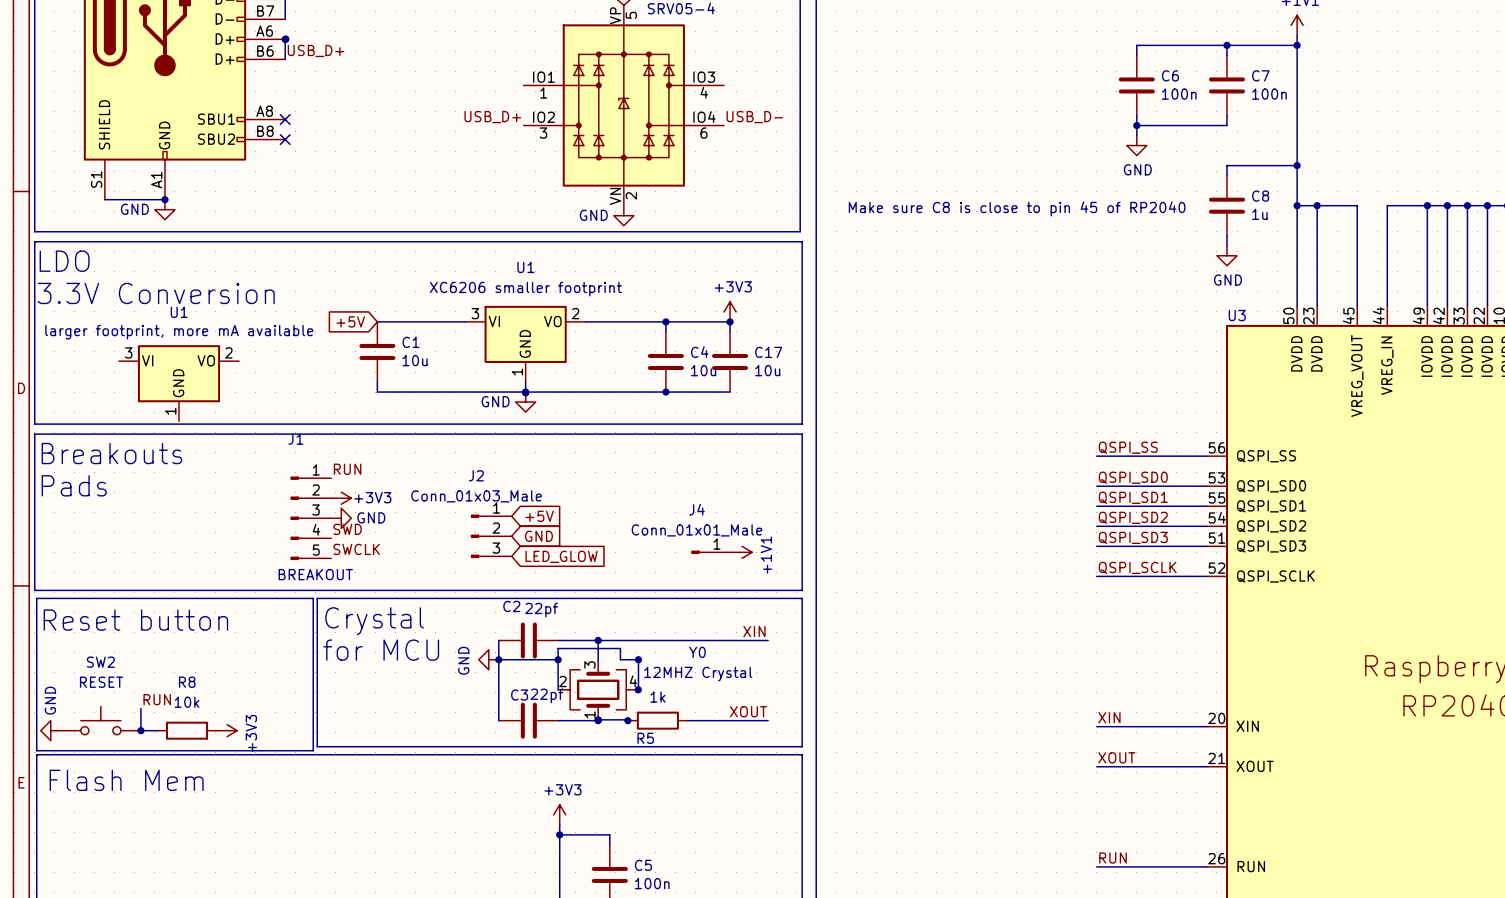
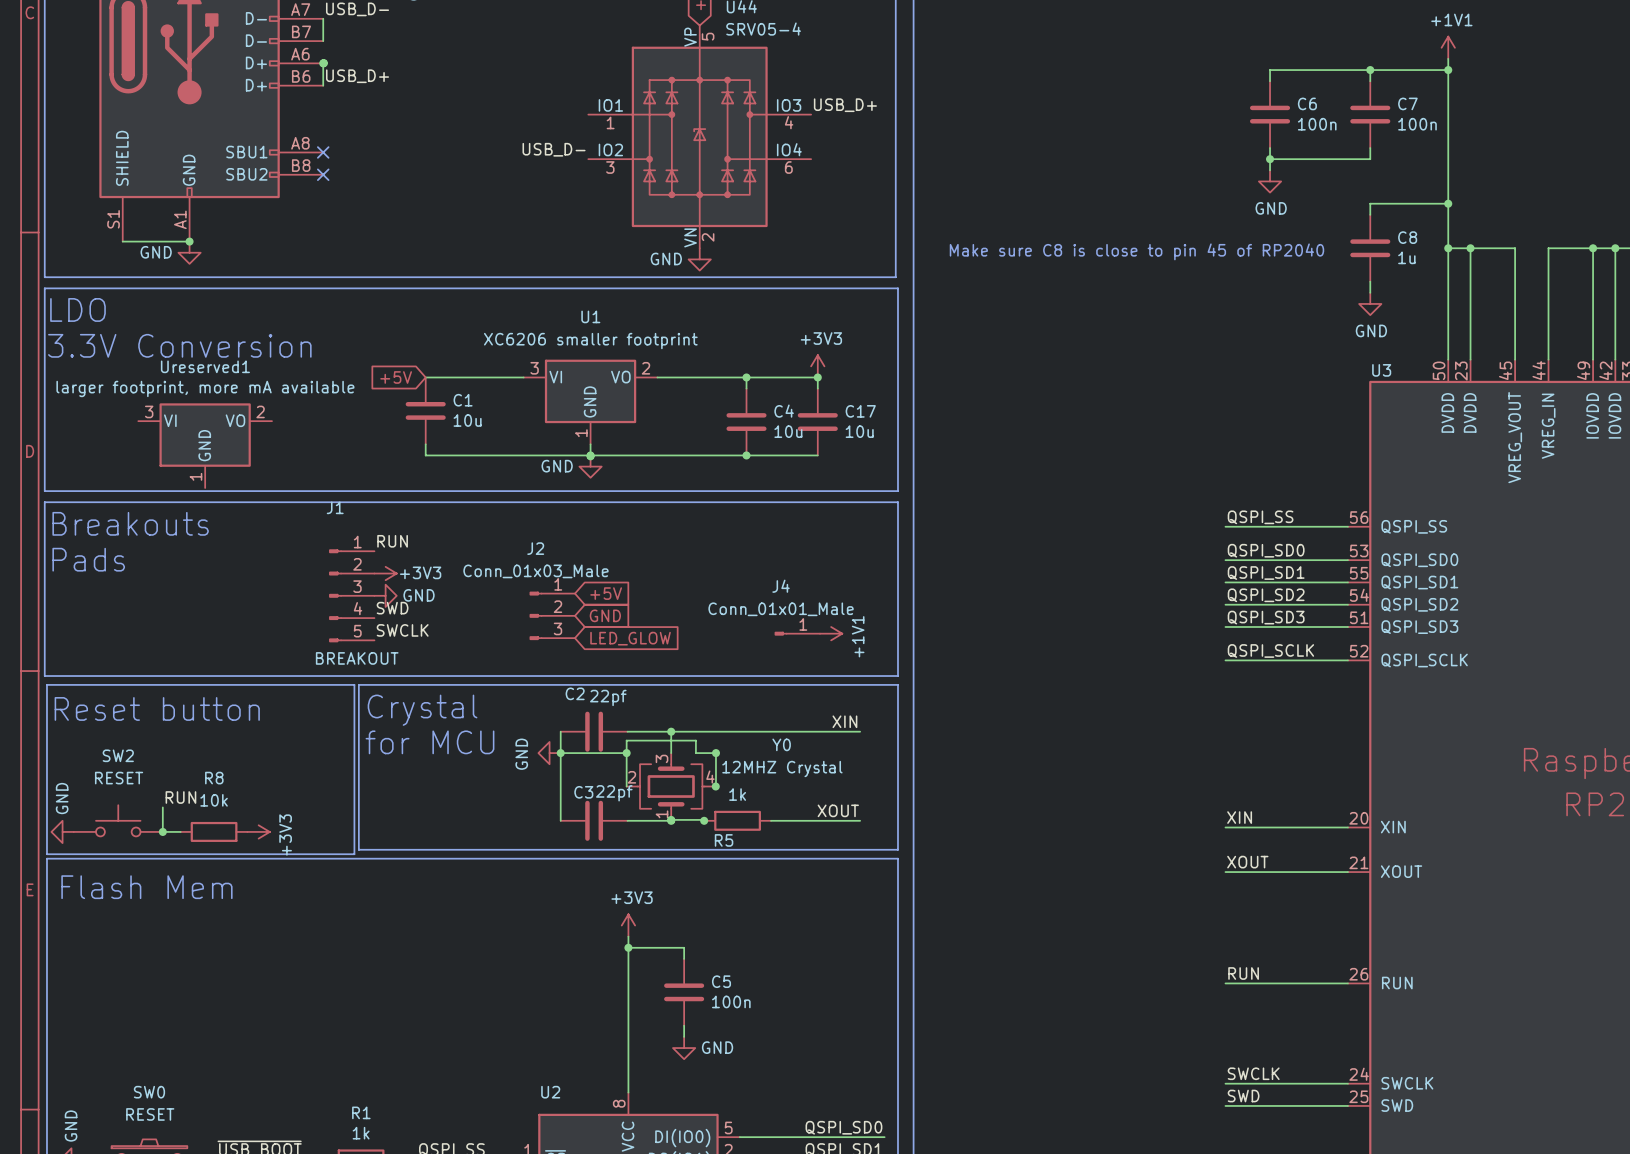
label: none -> USB_D+ (845, 105)
label: USB_D+ (492, 117) -> USB_D- (554, 149)
label: USB_D- (754, 117) -> none
U1 name: U1 (179, 312) -> Ureserved1 (205, 366)

